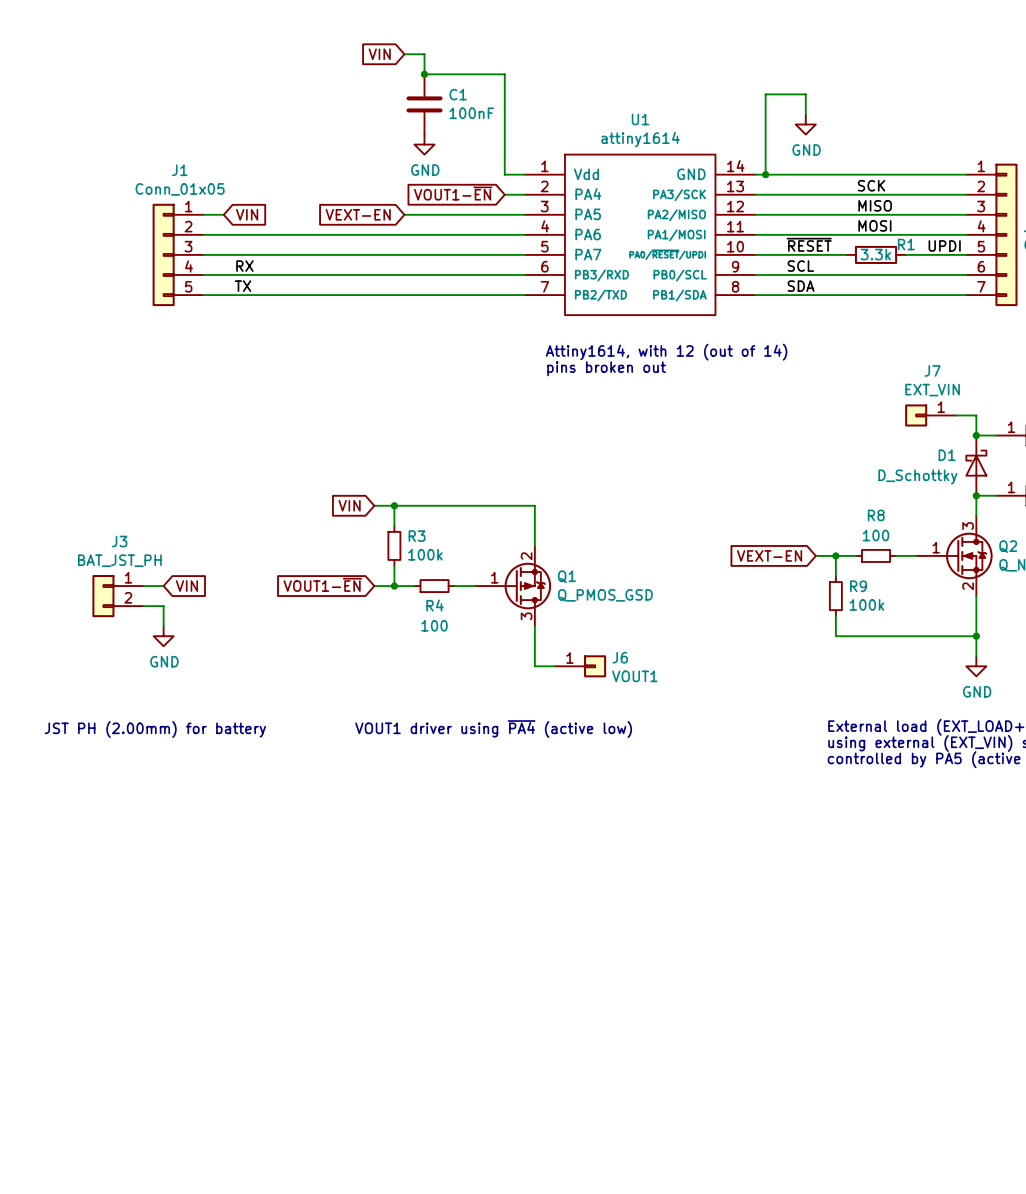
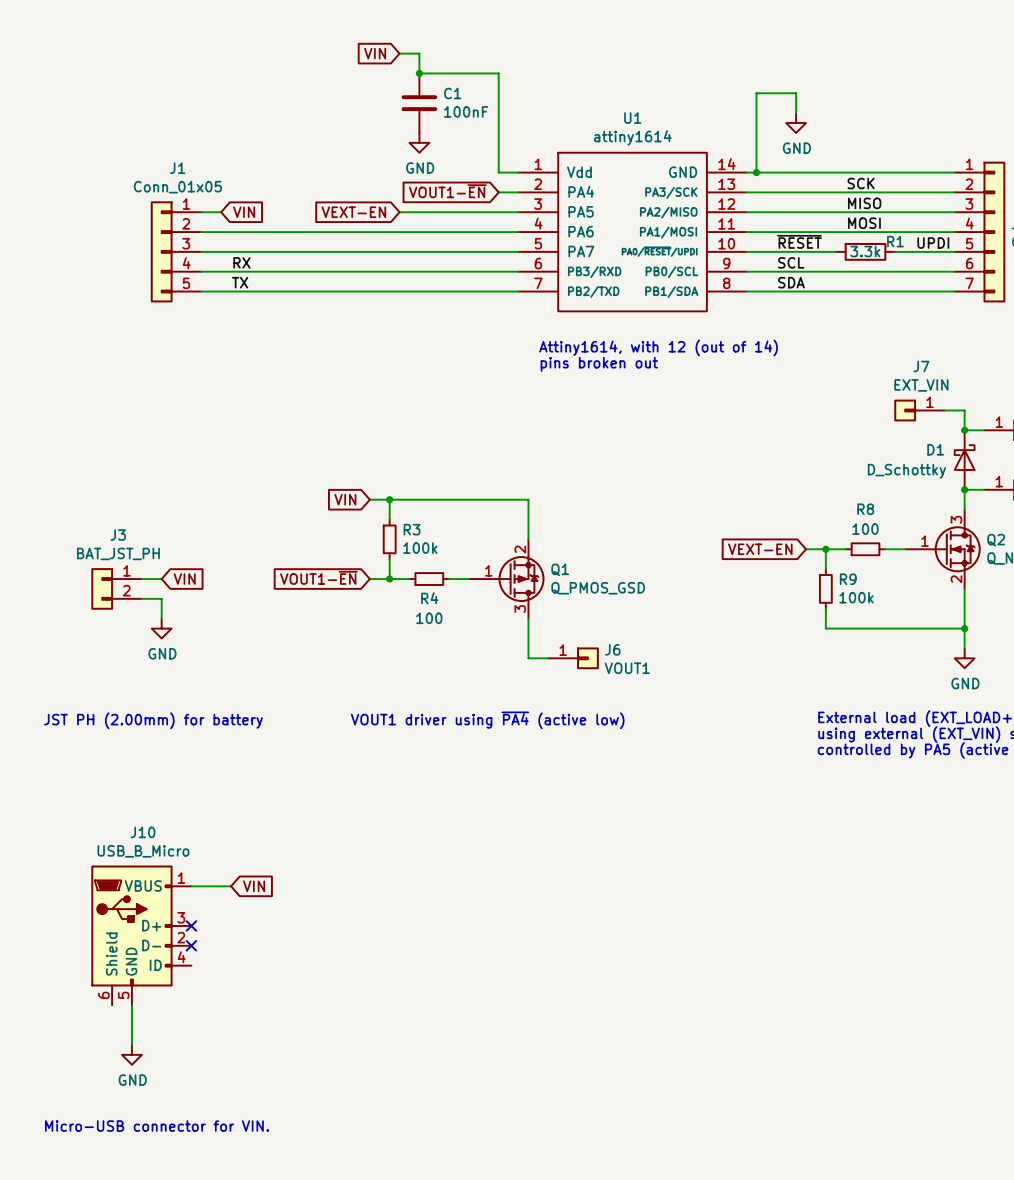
wire: none -> (191, 886) (231, 886)
global label: none -> VIN (254, 886)
no-connect mark: none -> (191, 925)
J10: none -> USB_B_Micro (141, 935)
no-connect mark: none -> (191, 945)
wire: none -> (131, 1005) (131, 1044)
power symbol: none -> GND (131, 1054)
text: none -> Micro-USB connector for VIN. (157, 1126)

